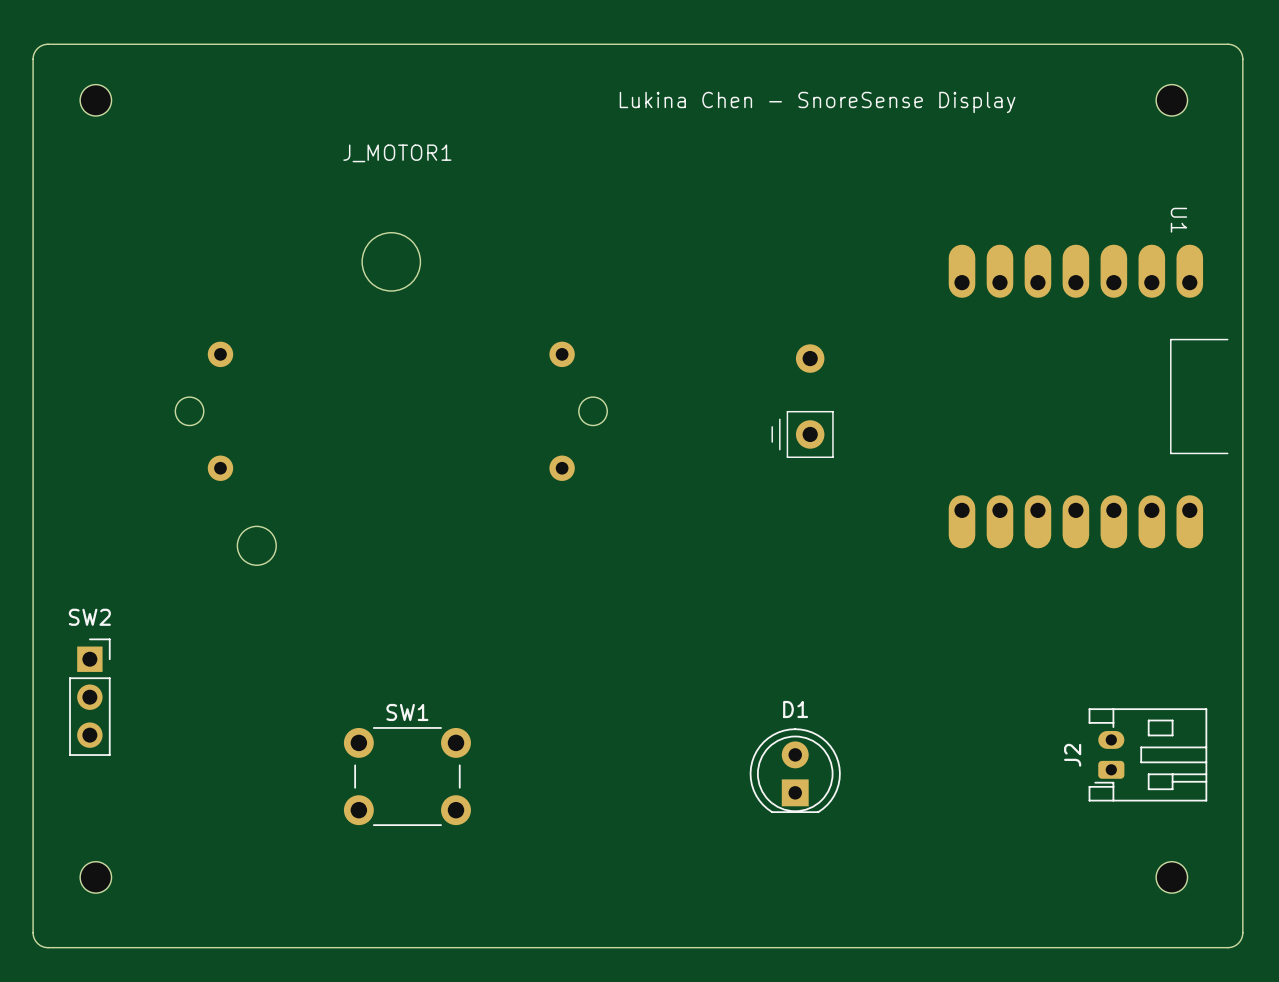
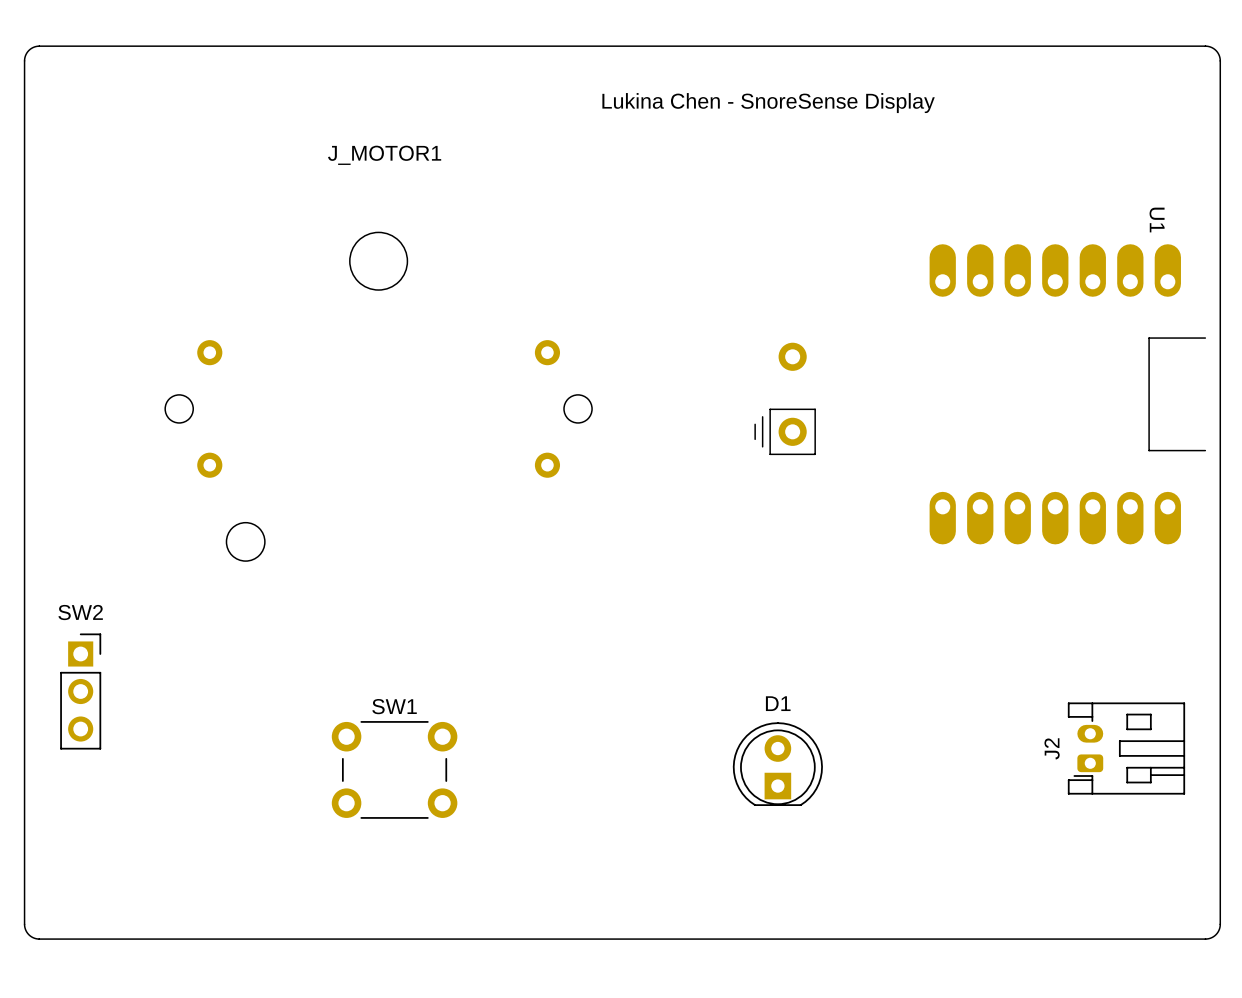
part: (95, 100) -> none
part: (1171, 100) -> none
part: (95, 877) -> none
part: (1171, 877) -> none

